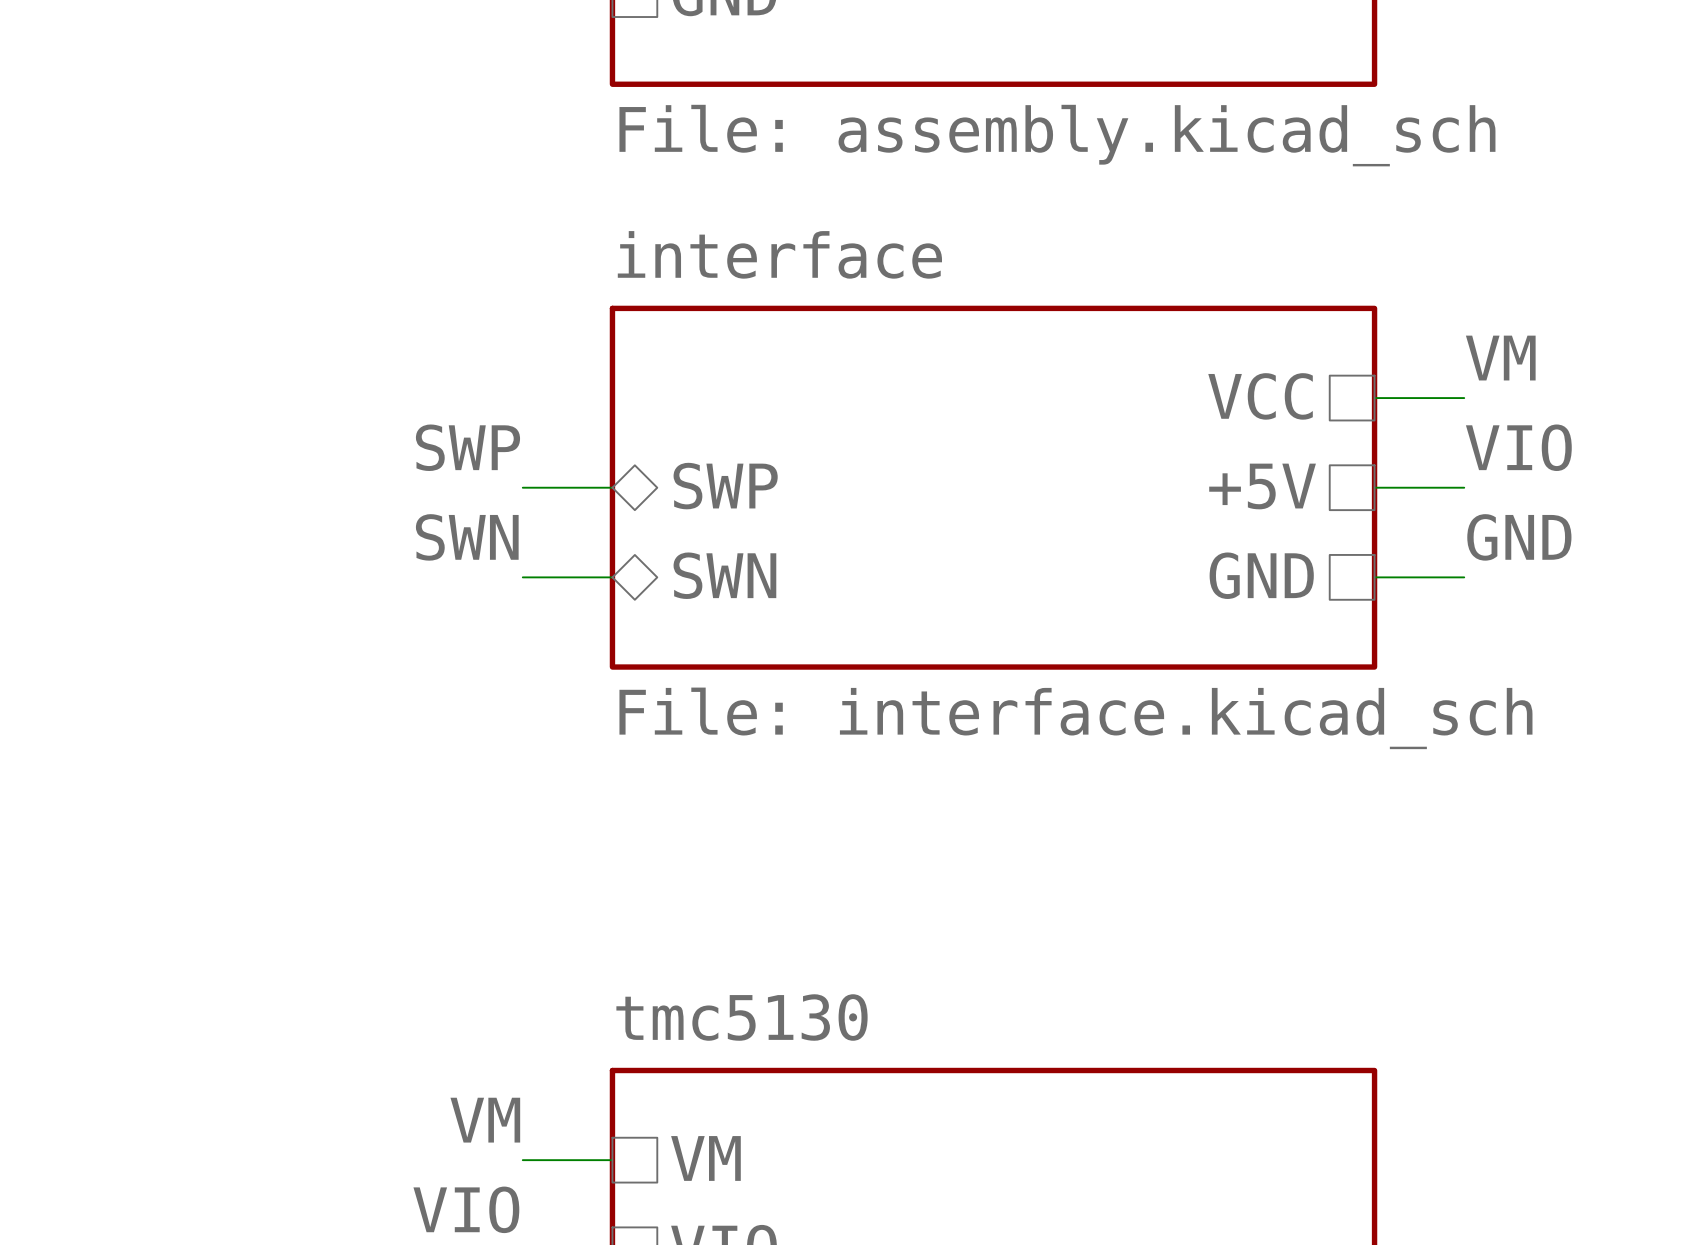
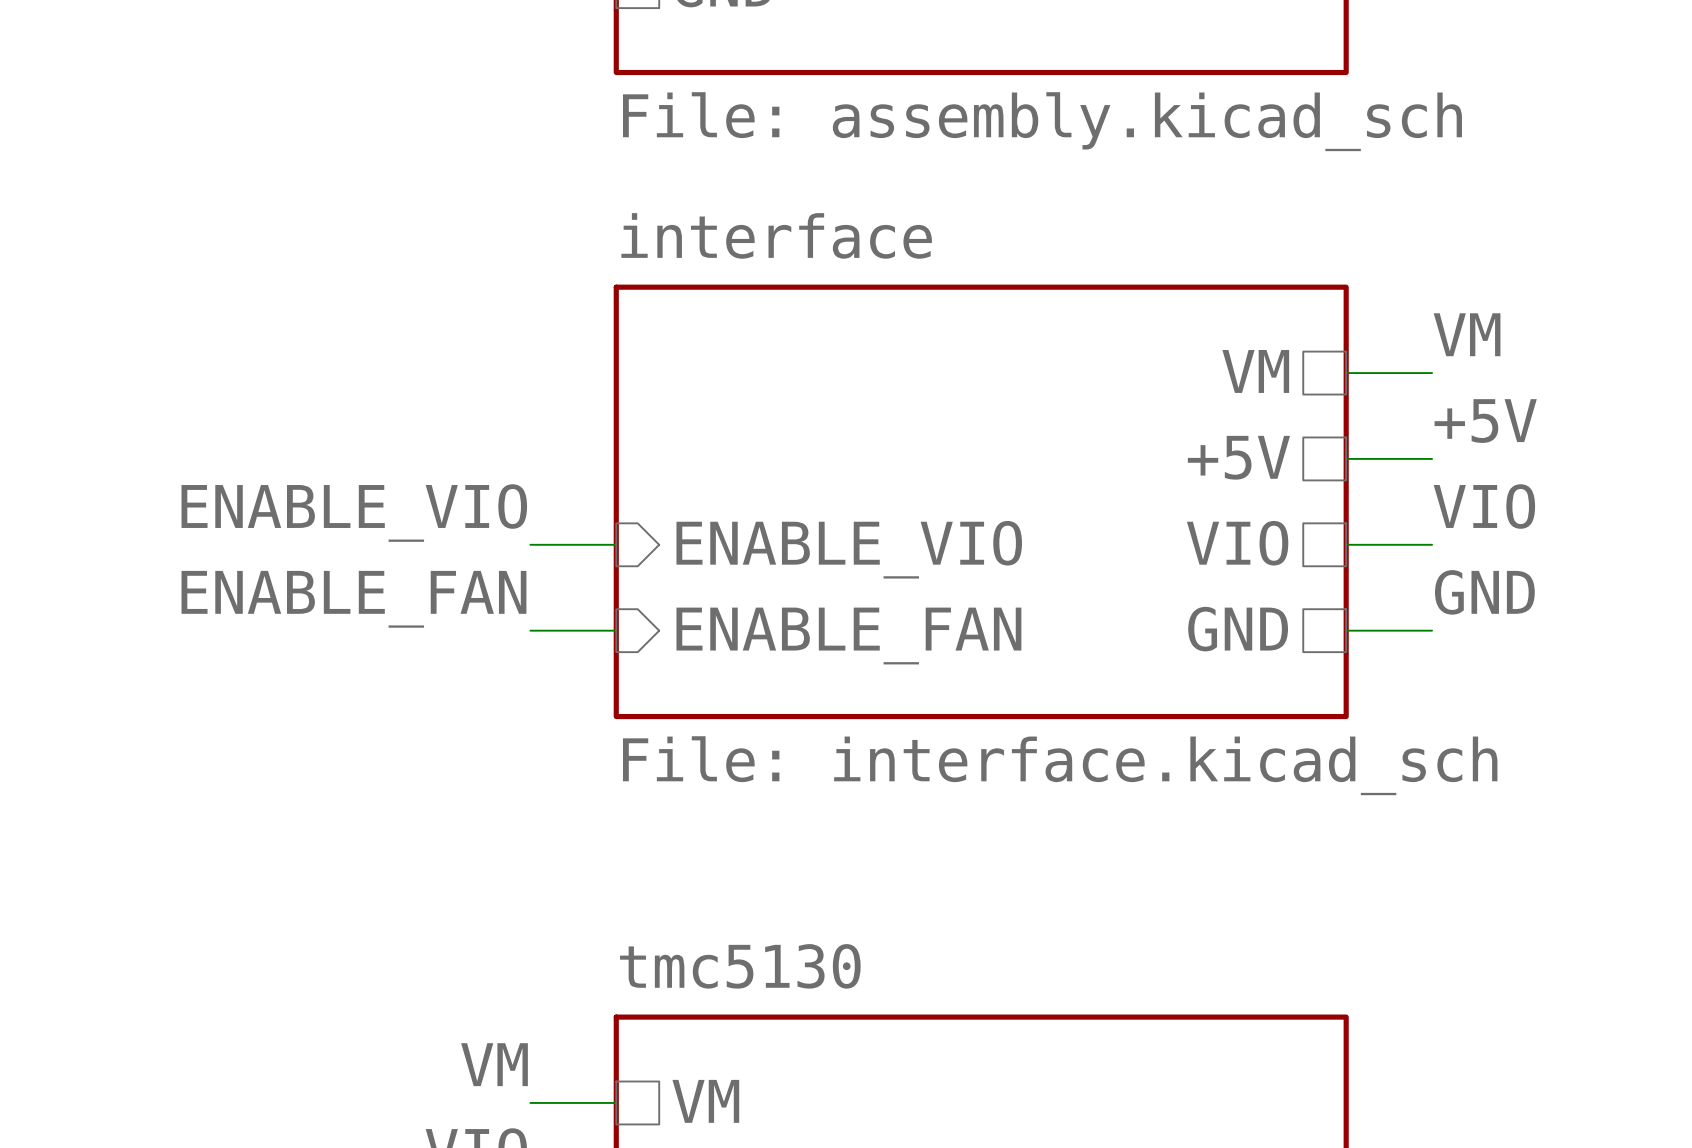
sheet pin: VCC (1260, 396) -> VM (1255, 371)
label: SWP (467, 447) -> none
label: VIO (1518, 447) -> +5V (1485, 421)
sheet pin: SWP (725, 486) -> none
wire: (522, 487) (612, 487) -> (530, 630) (616, 630)
sheet interface: File: interface.kicad_sch (993, 487) -> none
sheet interface: none -> File: interface.kicad_sch (981, 501)
label: SWN (467, 537) -> ENABLE_VIO (354, 513)
label: GND (1519, 537) -> VIO (1484, 506)
sheet pin shape: bidirectional (724, 575) -> input (849, 549)
sheet pin: SWN (724, 575) -> ENABLE_VIO (849, 549)
sheet pin: GND (1261, 575) -> VIO (1237, 543)
label: none -> GND (1484, 592)
label: none -> ENABLE_FAN (353, 599)
sheet pin: none -> GND (1238, 629)
wire: none -> (1346, 630) (1432, 630)
sheet pin: none -> ENABLE_FAN (848, 636)

